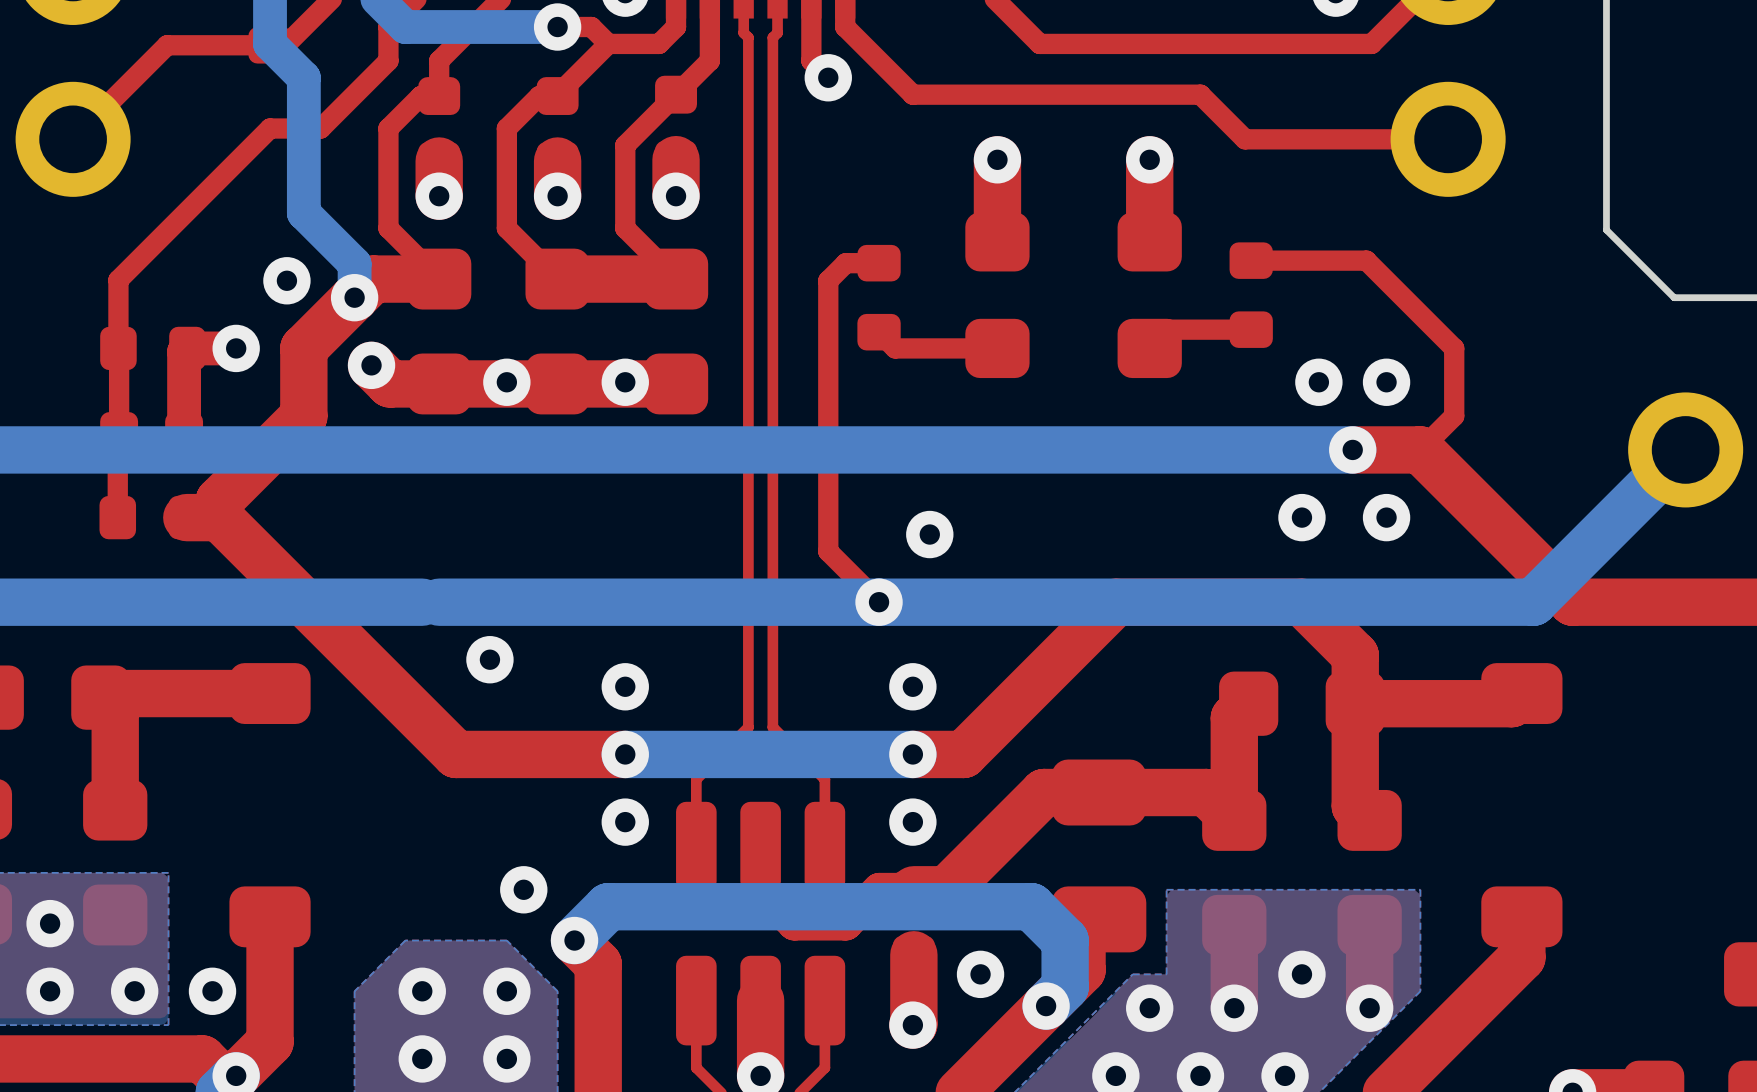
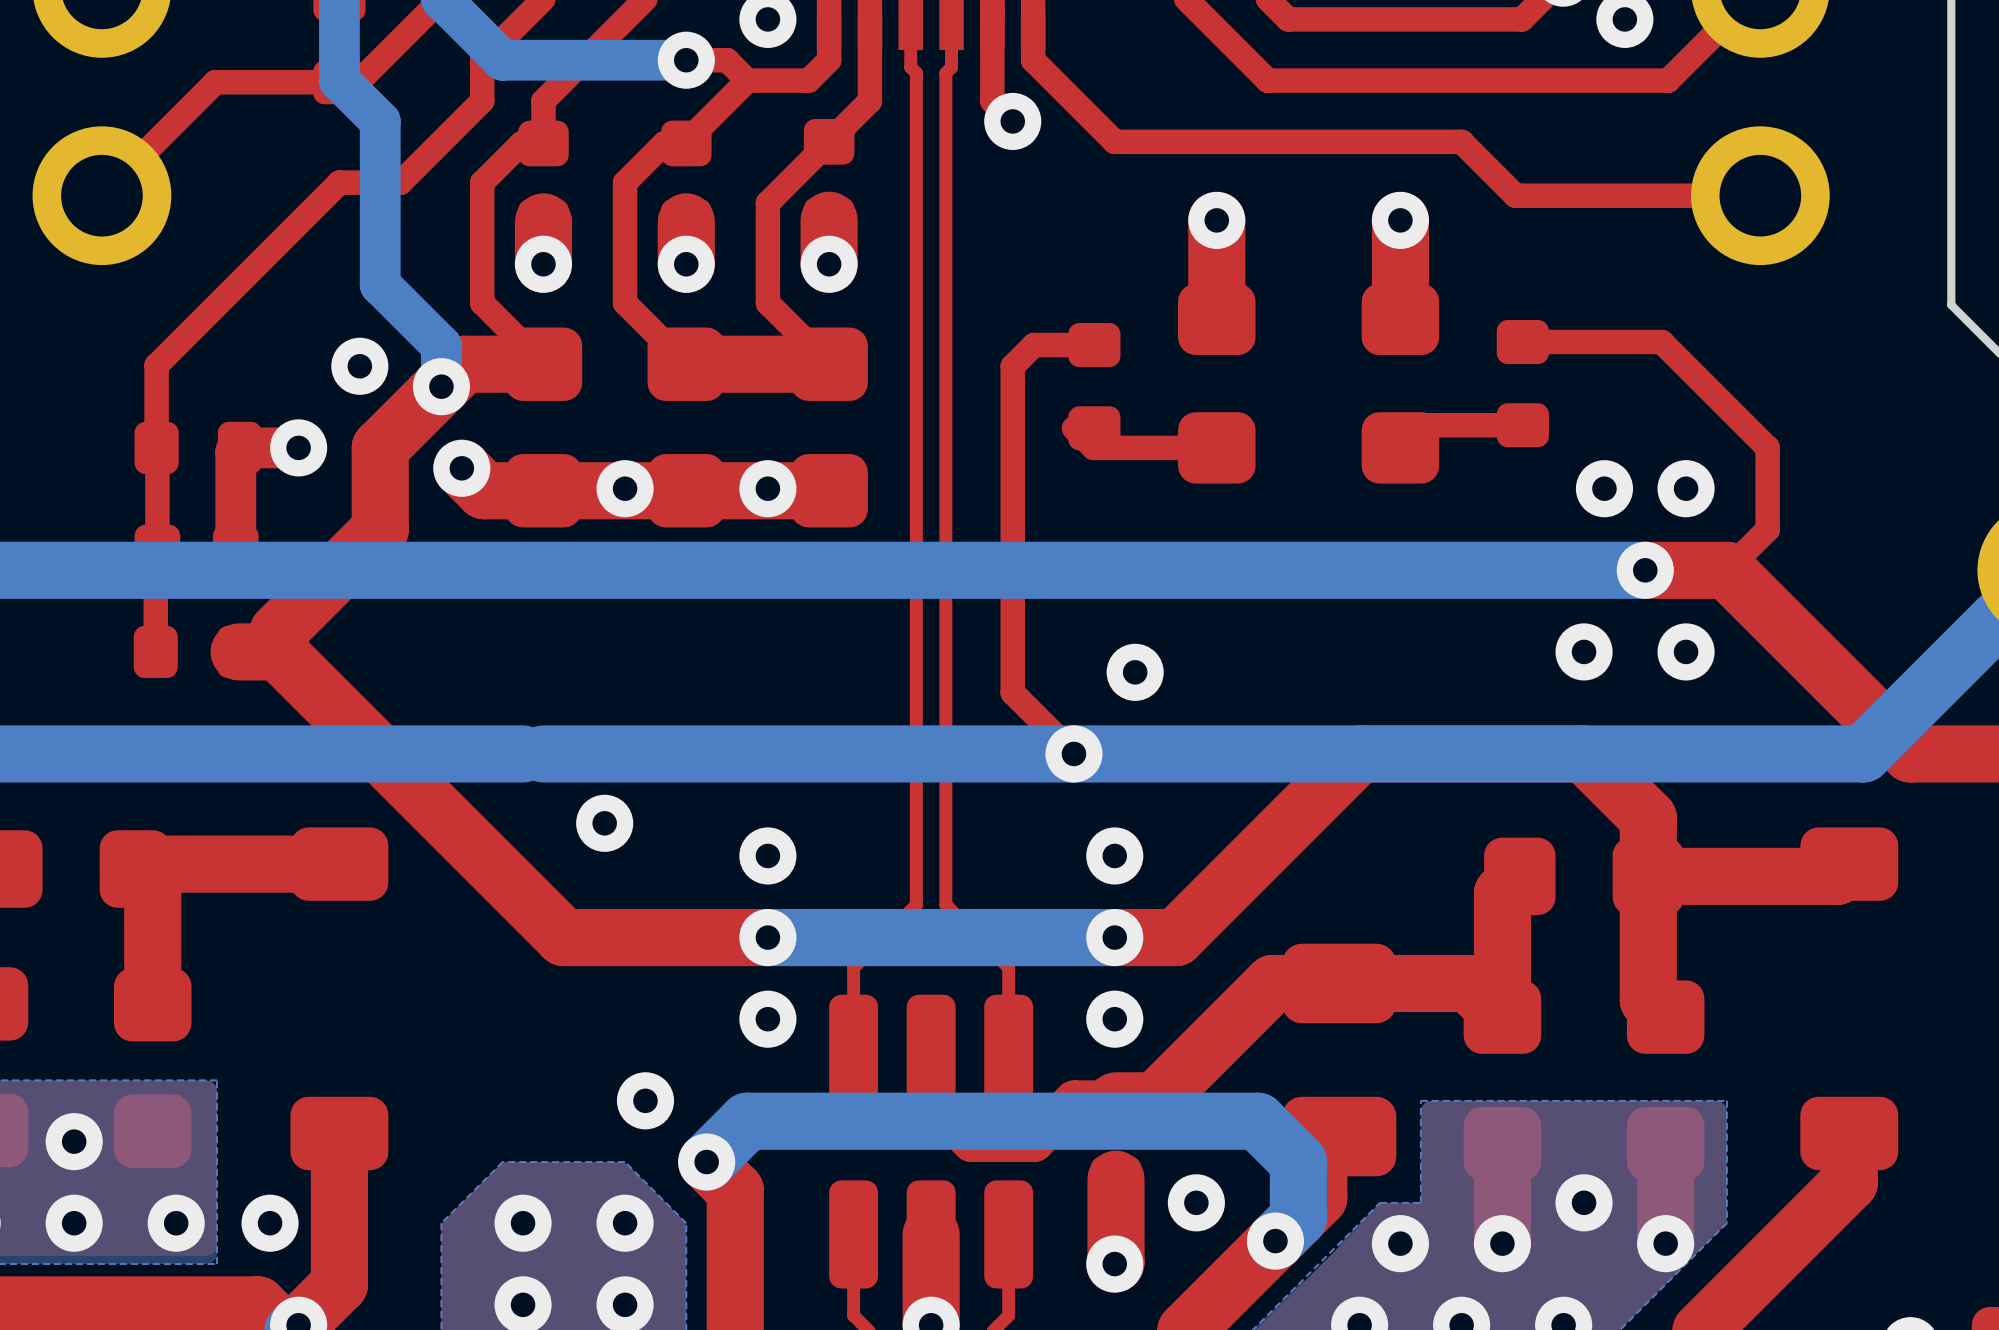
part position: (879, 297) -> (1094, 386)

